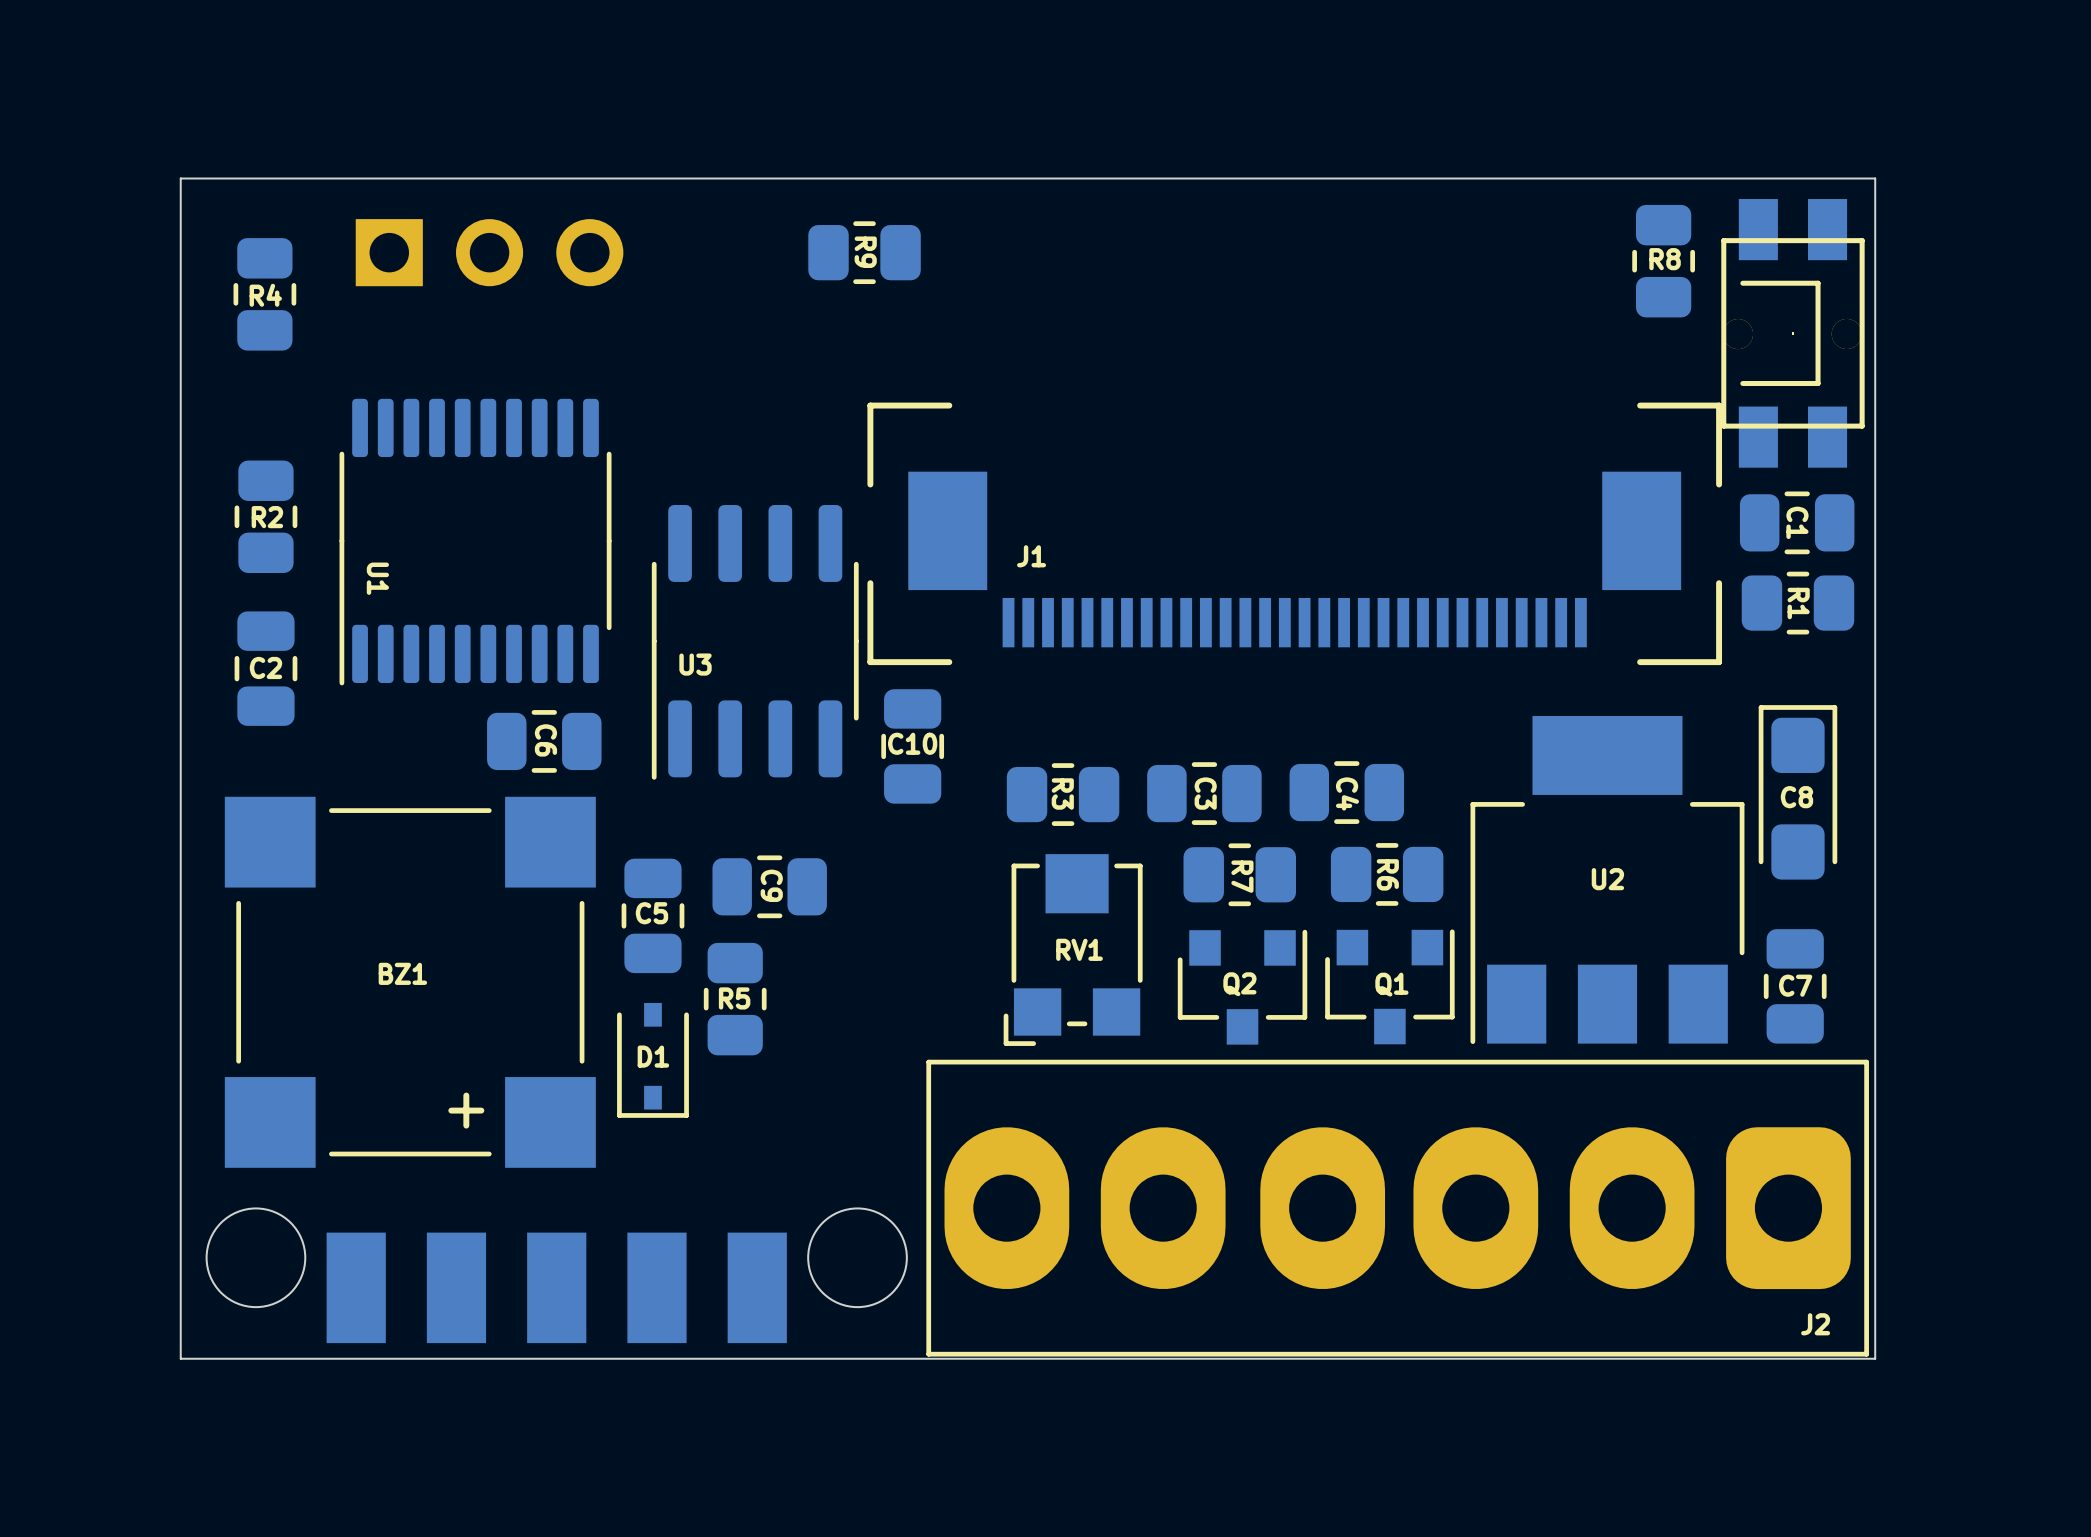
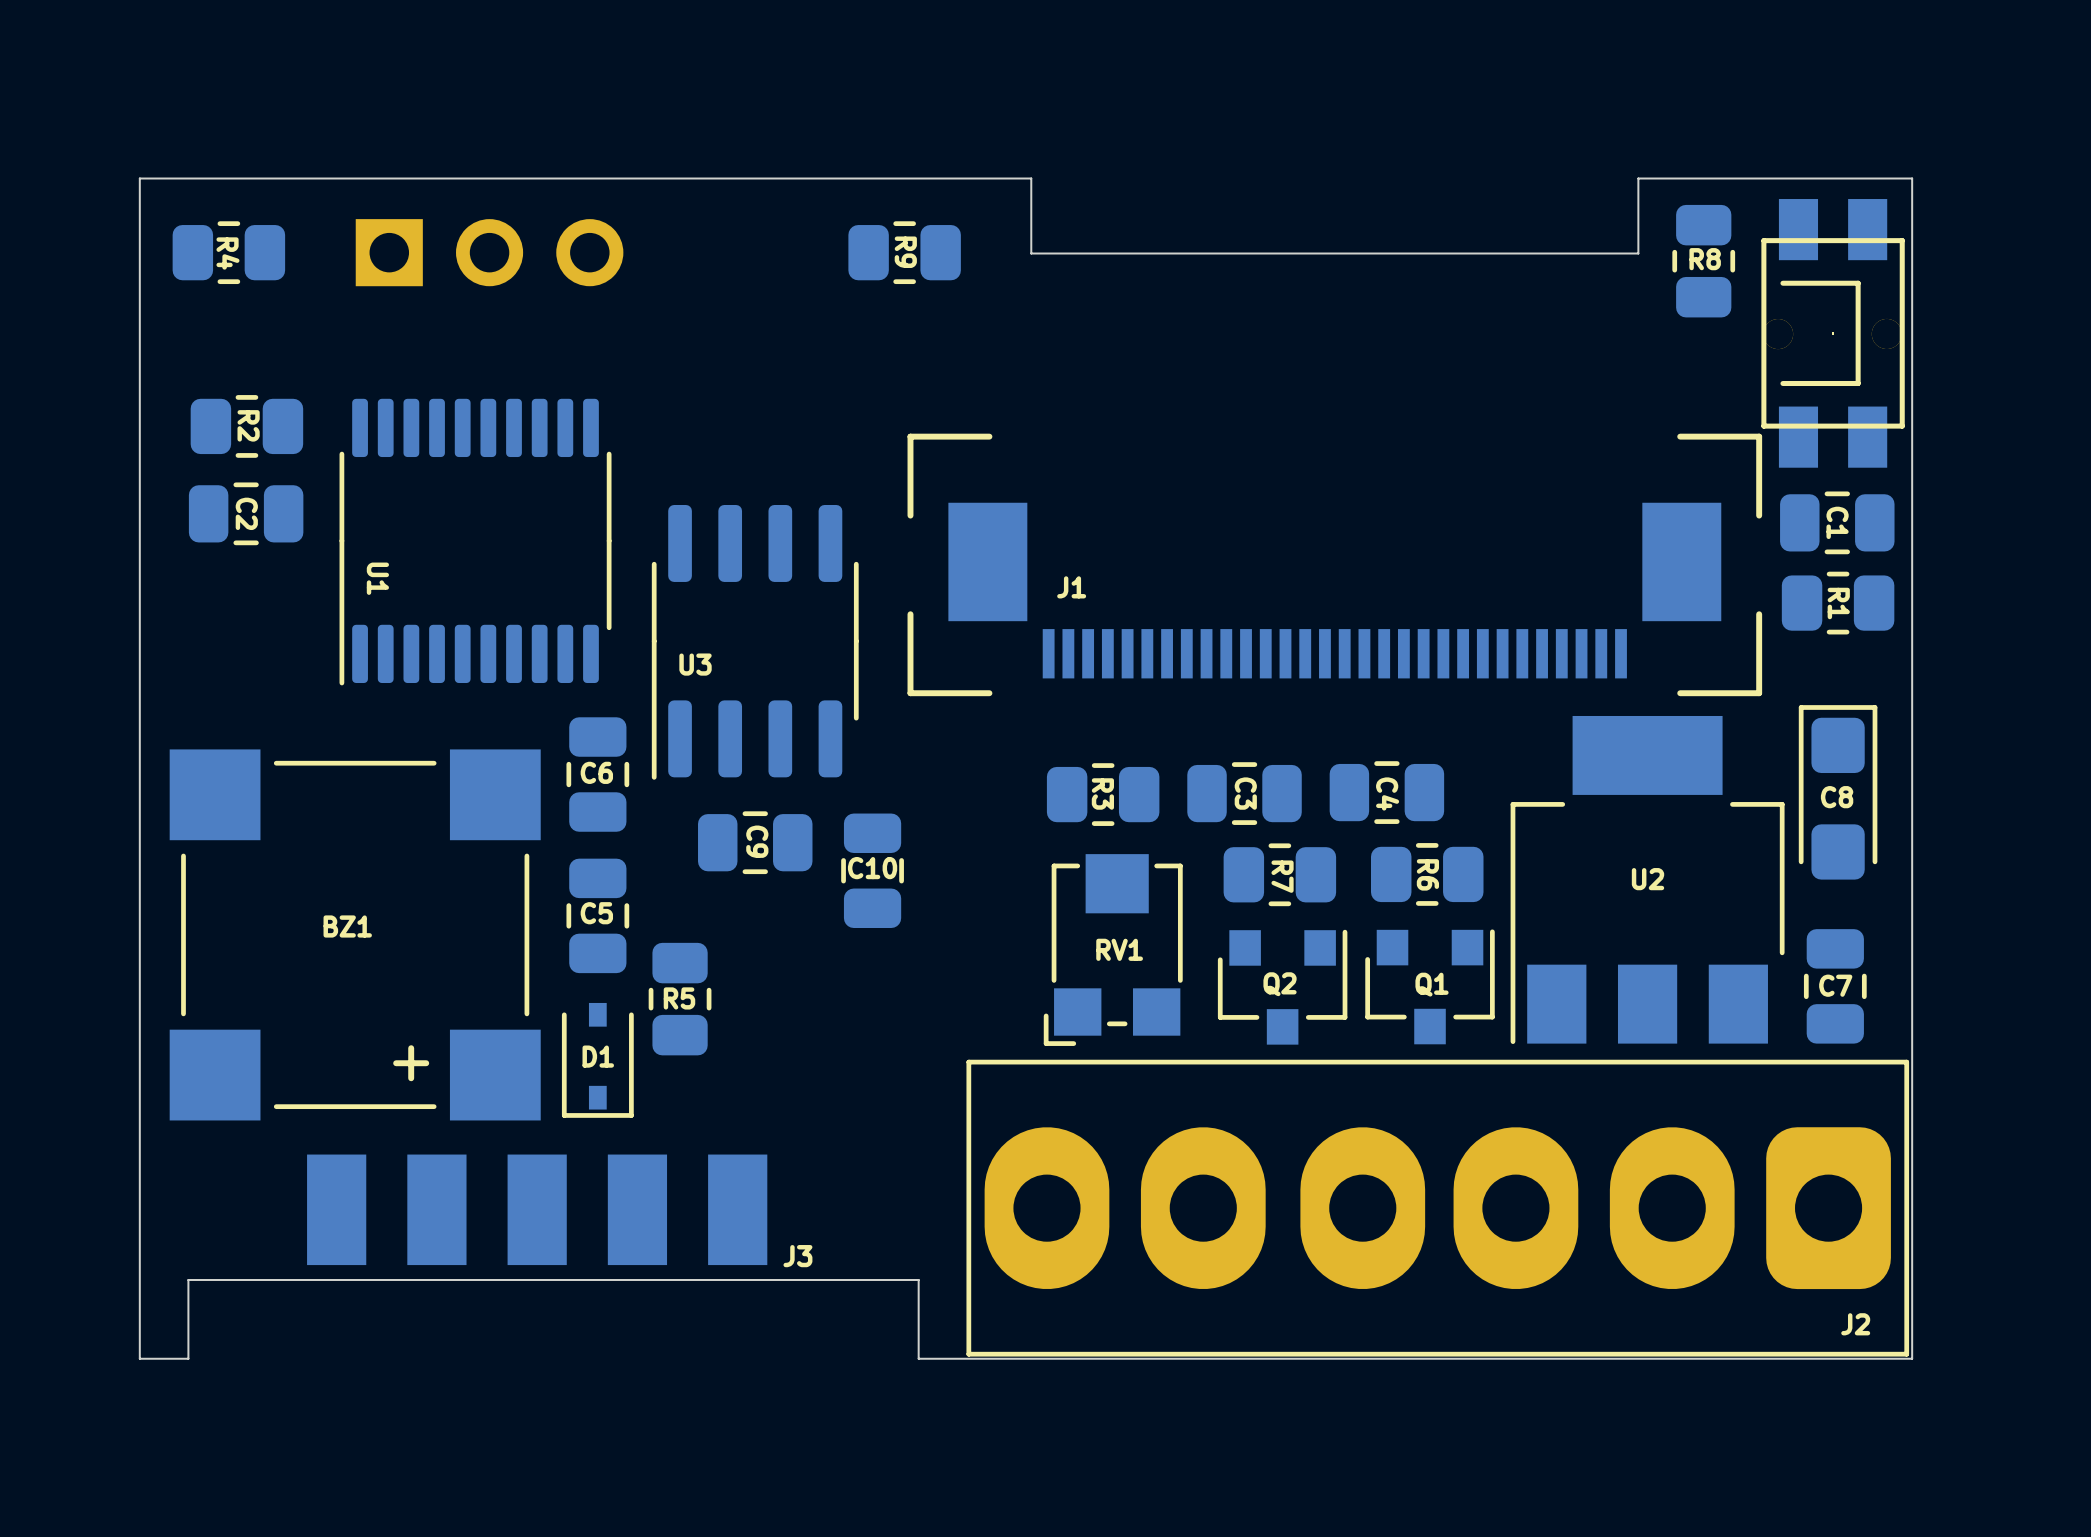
board edge: (180, 178) (180, 1358) -> (180, 178) (139, 178) (139, 1358) (180, 1358)
board edge: (1638, 178) (1031, 178) -> (1638, 178) (1638, 253) (1031, 253) (1031, 178)
board edge: (1875, 178) (1875, 1358) -> (1875, 178) (1912, 178) (1912, 1358) (1875, 1358)
R9 position: (864, 252) -> (904, 252)
R8 position: (1663, 261) -> (1703, 261)
R4 rotation: 0° (264, 294) -> 90° clockwise (228, 252)
part position: (1792, 333) -> (1833, 333)
R2 rotation: 0° (265, 516) -> 90° clockwise (246, 426)
R2 position: (265, 516) -> (246, 426)
C1 position: (1797, 522) -> (1837, 522)
J1 position: (1294, 533) -> (1334, 564)
R1 position: (1797, 603) -> (1838, 603)
C2 rotation: 0° (265, 668) -> 90° clockwise (246, 513)
C2 position: (265, 668) -> (246, 513)
C6 rotation: 0° (544, 741) -> 90° clockwise (597, 774)
C10 position: (912, 746) -> (872, 870)
C4 position: (1346, 792) -> (1386, 792)
C8 position: (1797, 792) -> (1838, 792)
C3 position: (1204, 793) -> (1244, 793)
R3 position: (1063, 794) -> (1103, 794)
R7 position: (1239, 874) -> (1279, 874)
R6 position: (1387, 874) -> (1427, 874)
U2 position: (1607, 879) -> (1647, 879)
C9 position: (769, 886) -> (755, 842)
C5 position: (652, 915) -> (597, 915)
RV1 position: (1073, 950) -> (1113, 950)
BZ1 position: (410, 982) -> (355, 934)
Q1 position: (1389, 986) -> (1430, 986)
C7 position: (1795, 986) -> (1835, 986)
Q2 position: (1242, 987) -> (1282, 987)
R5 position: (735, 999) -> (680, 999)
D1 position: (652, 1060) -> (597, 1060)
J2 position: (1397, 1208) -> (1437, 1208)
J3: none -> (537, 1209)
part: (556, 1275) -> none
board edge: (918, 1358) (188, 1358) -> (918, 1358) (918, 1279) (188, 1279) (188, 1358)

